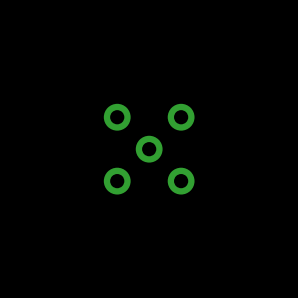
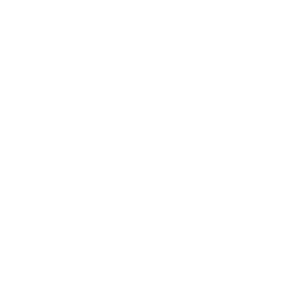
part: (149, 149) -> none

